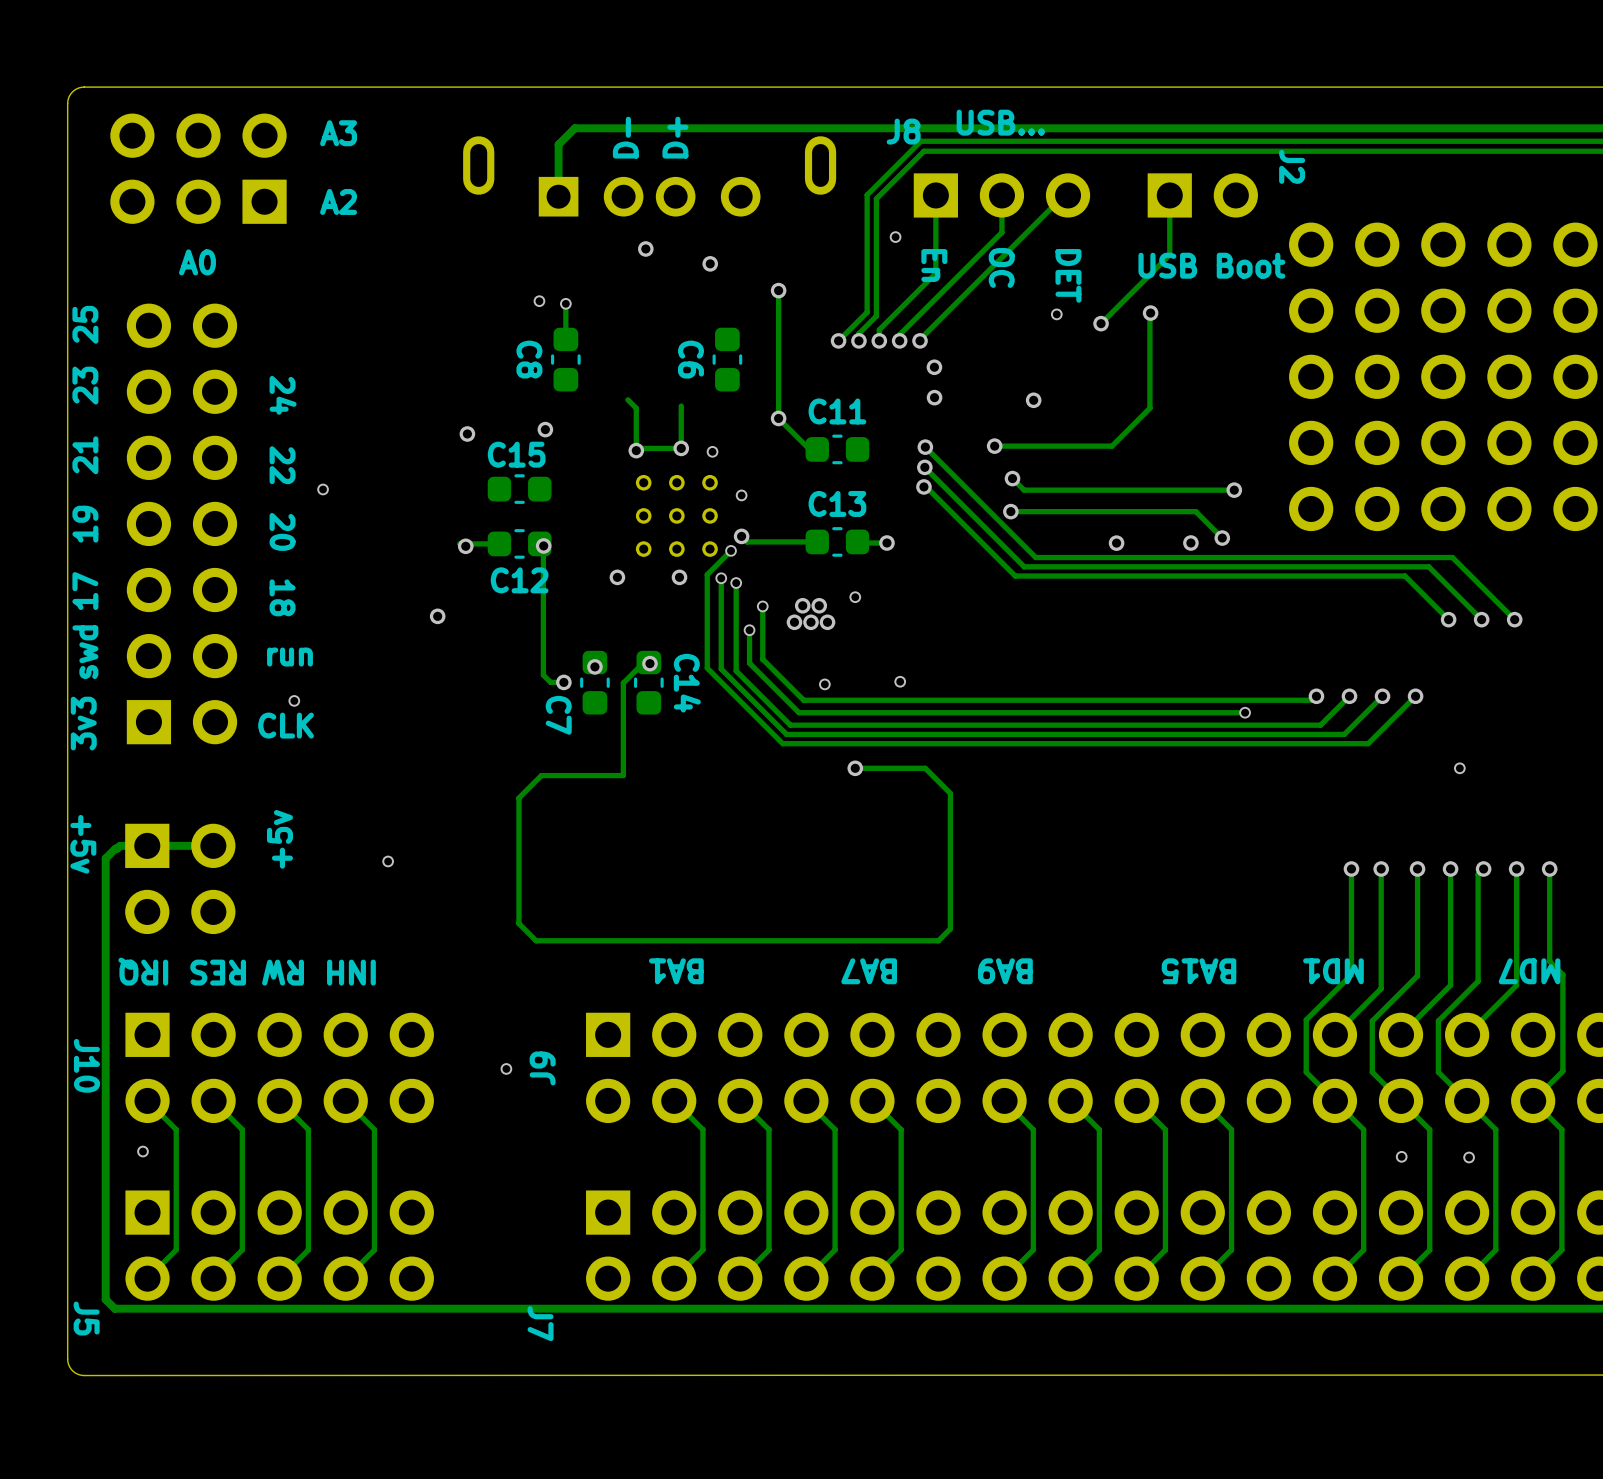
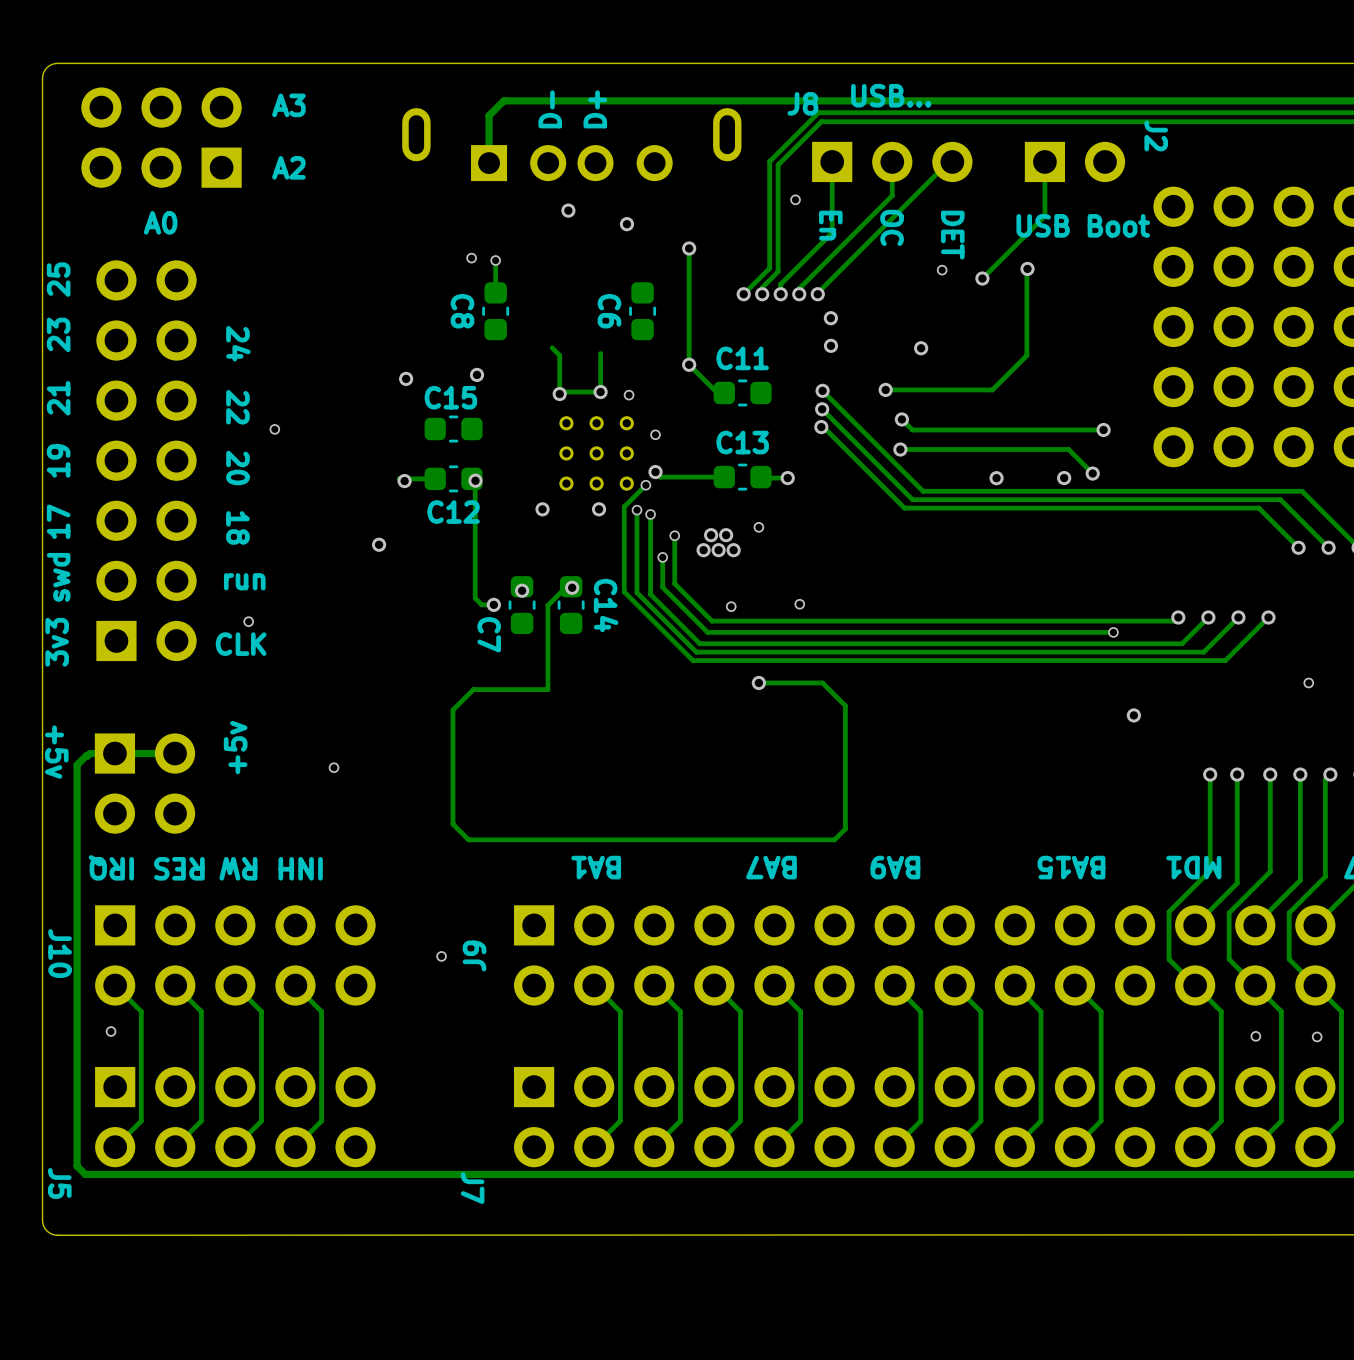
via: none -> (1133, 715)

